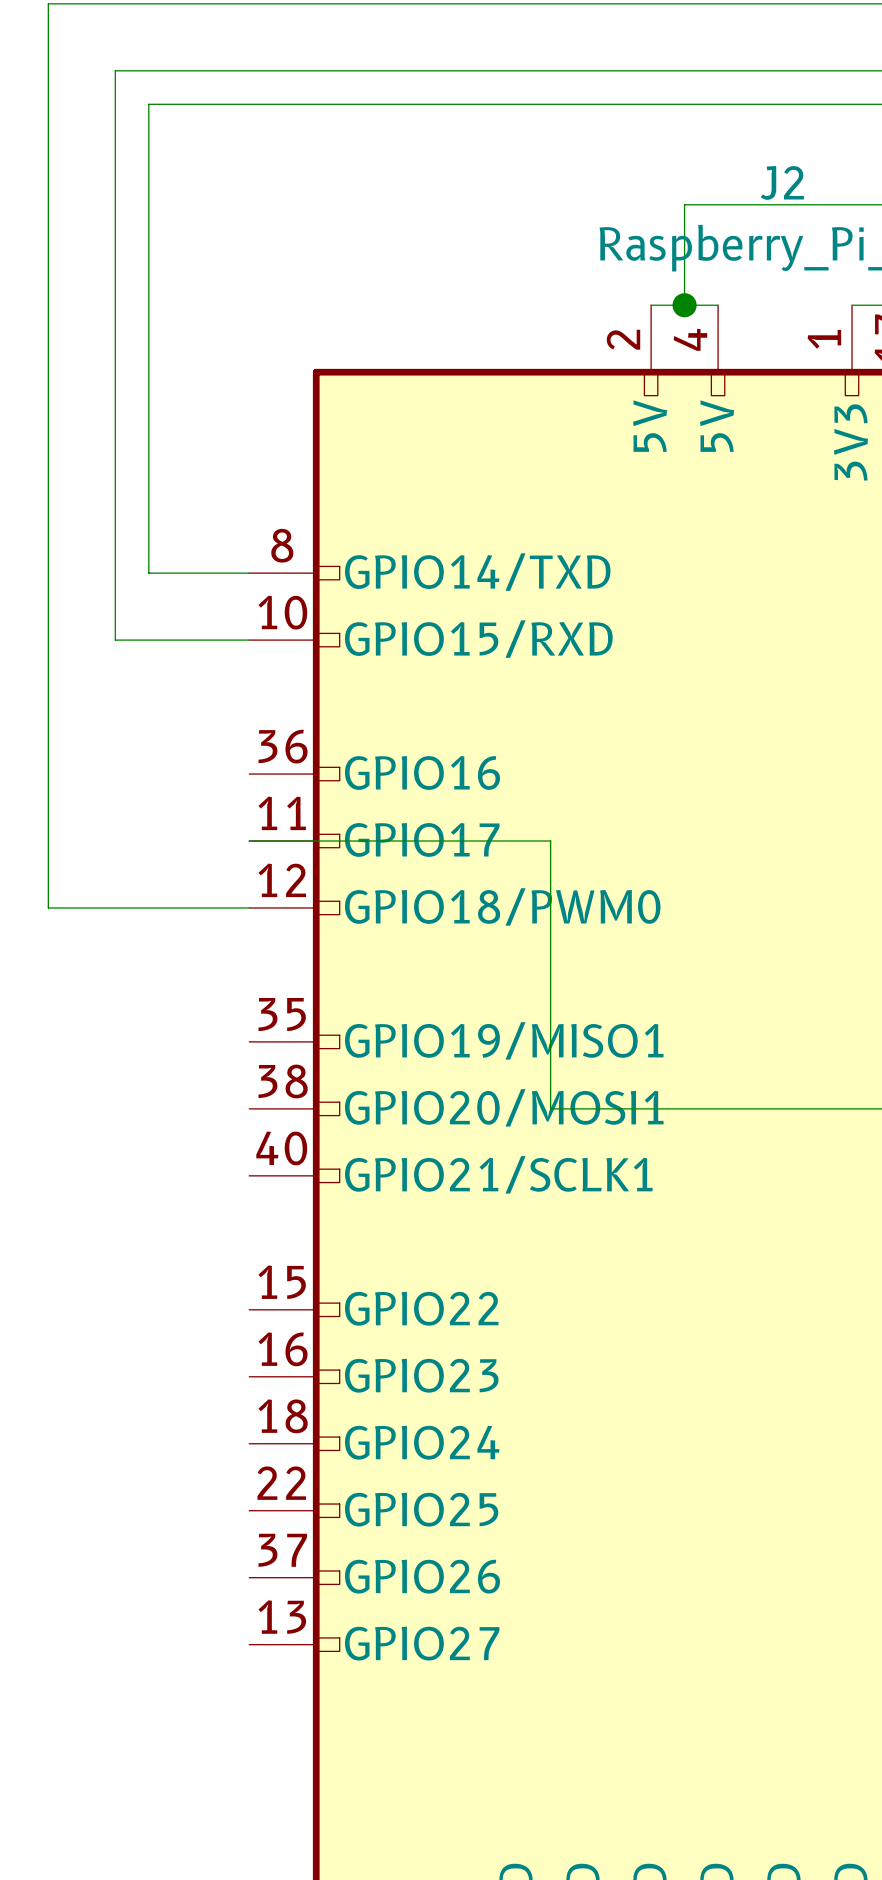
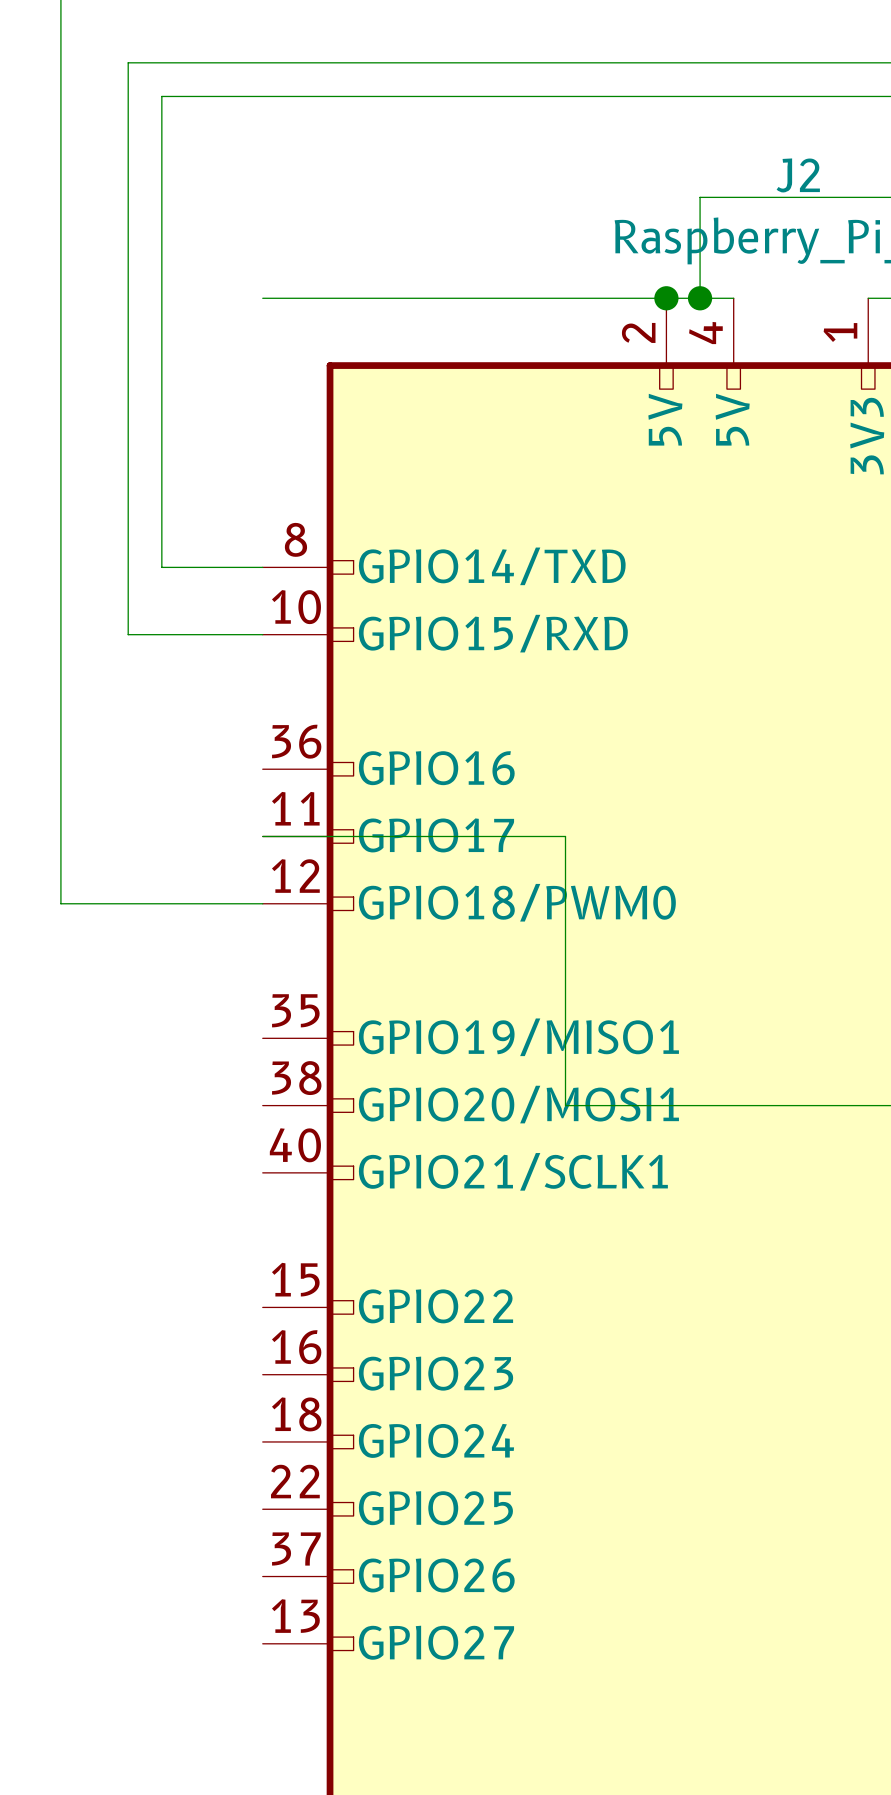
wire: none -> (262, 298) (666, 298)
junction: none -> (666, 298)

